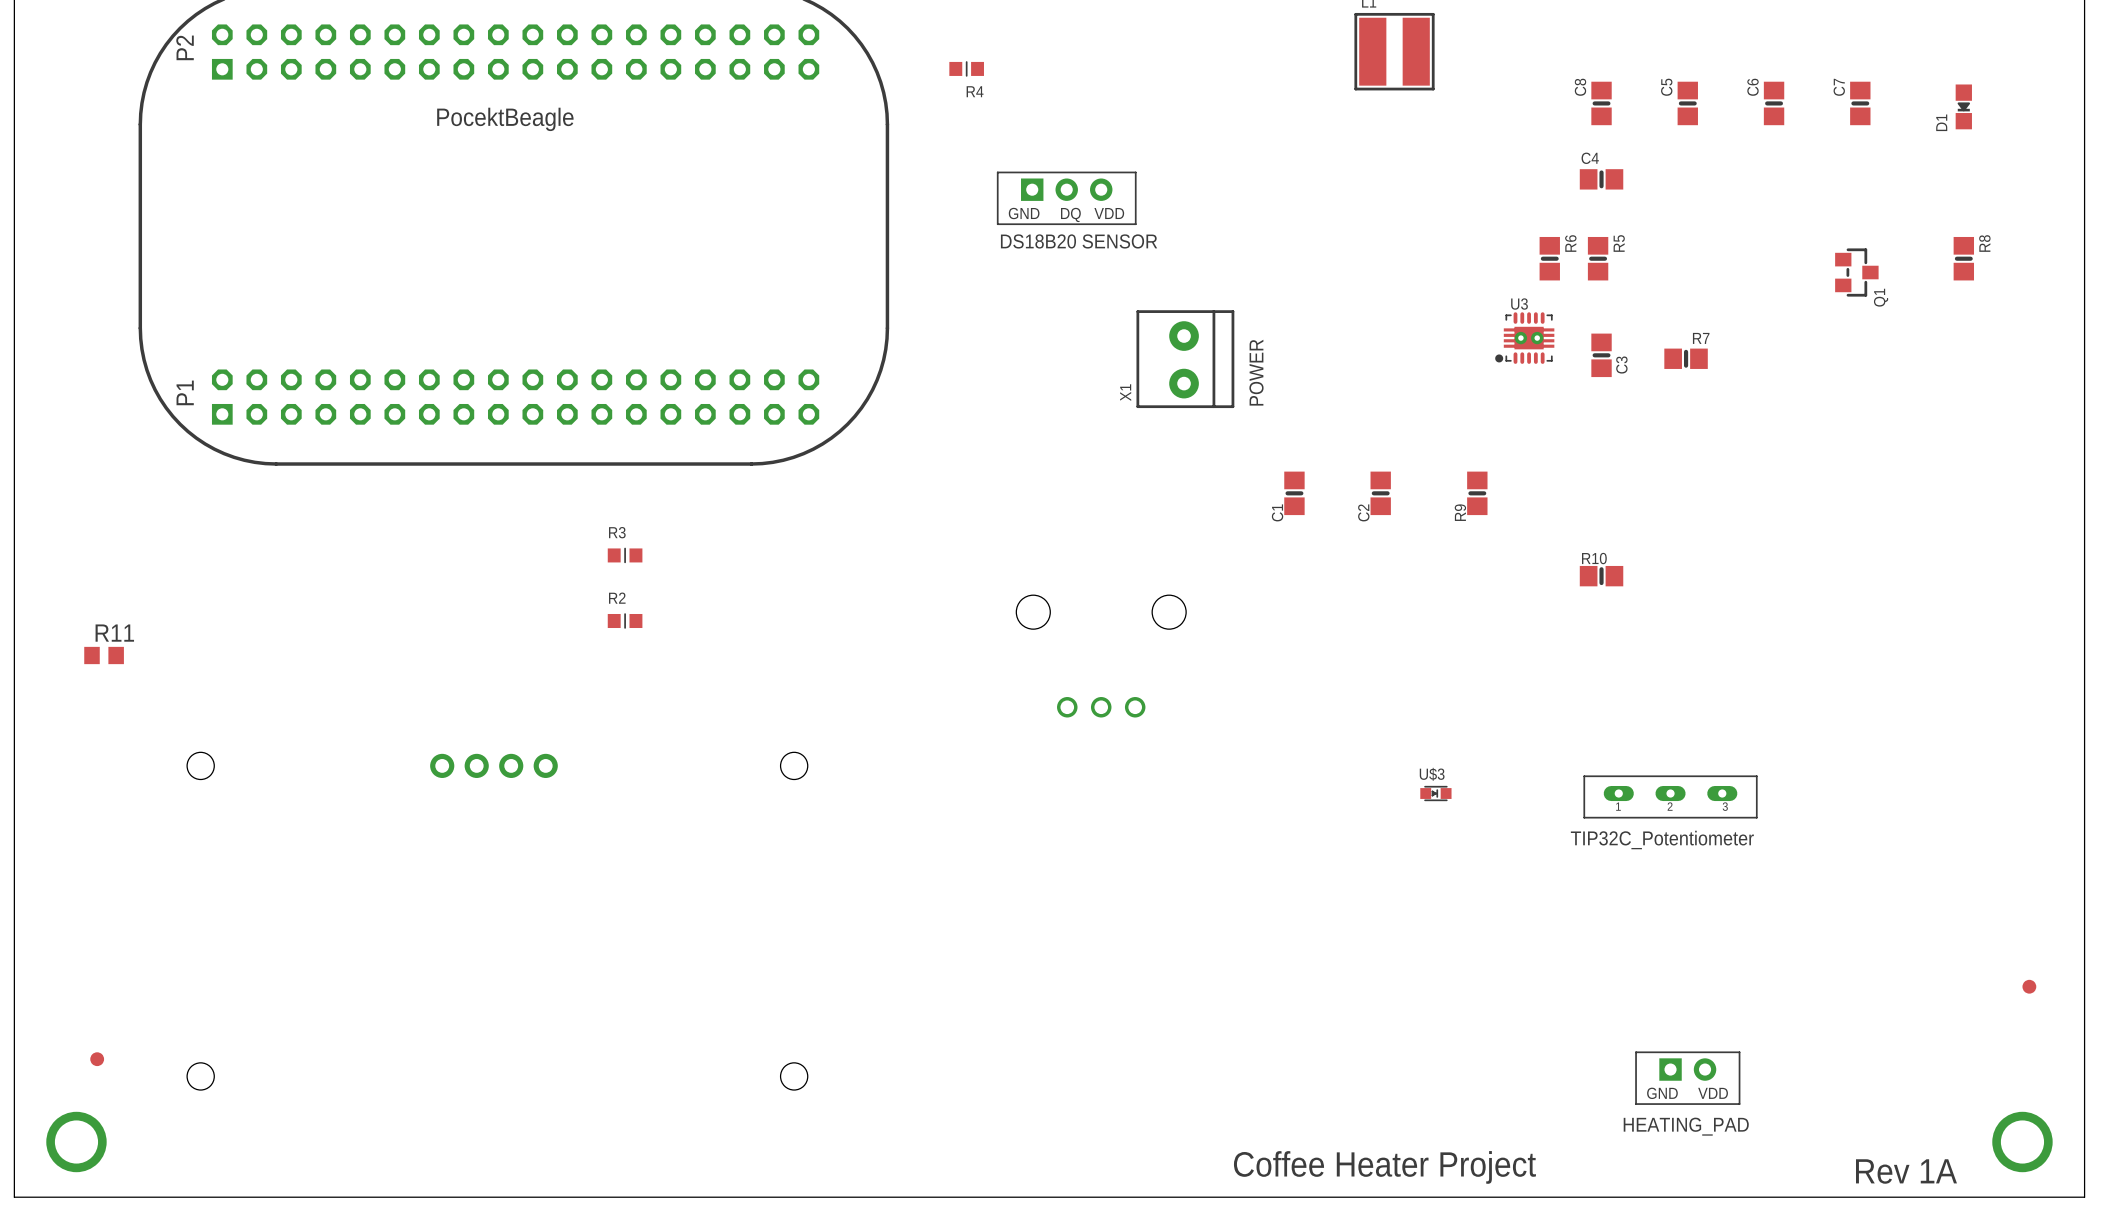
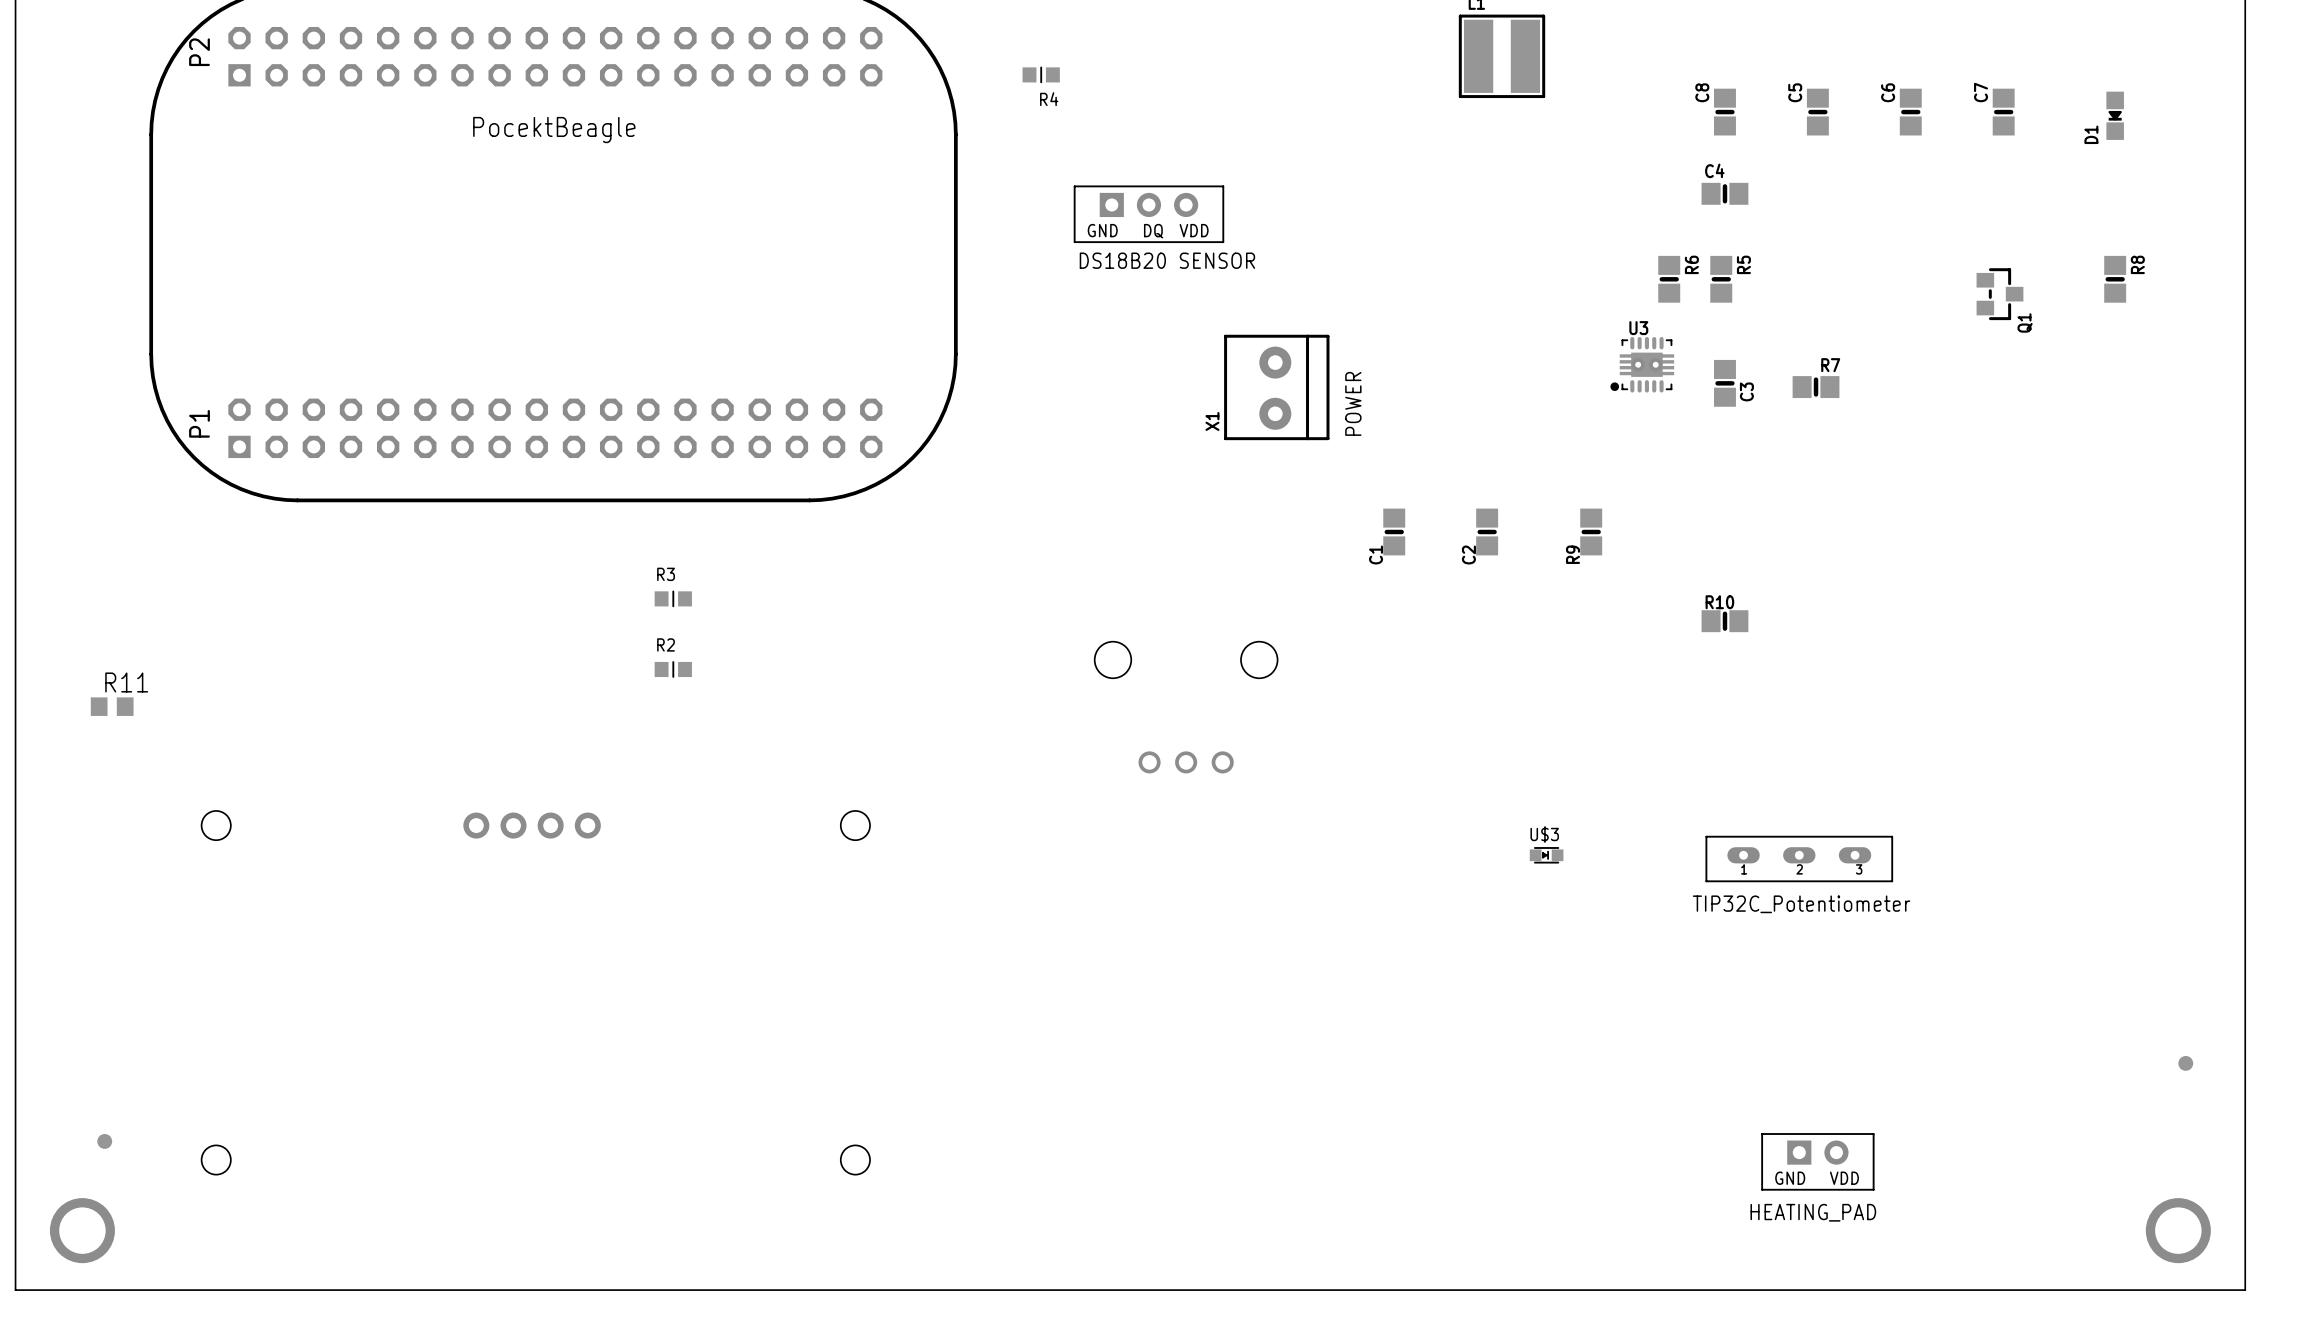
text: Coffee Heater Project (1384, 1167) -> none
text: Rev 1A (1906, 1171) -> none

